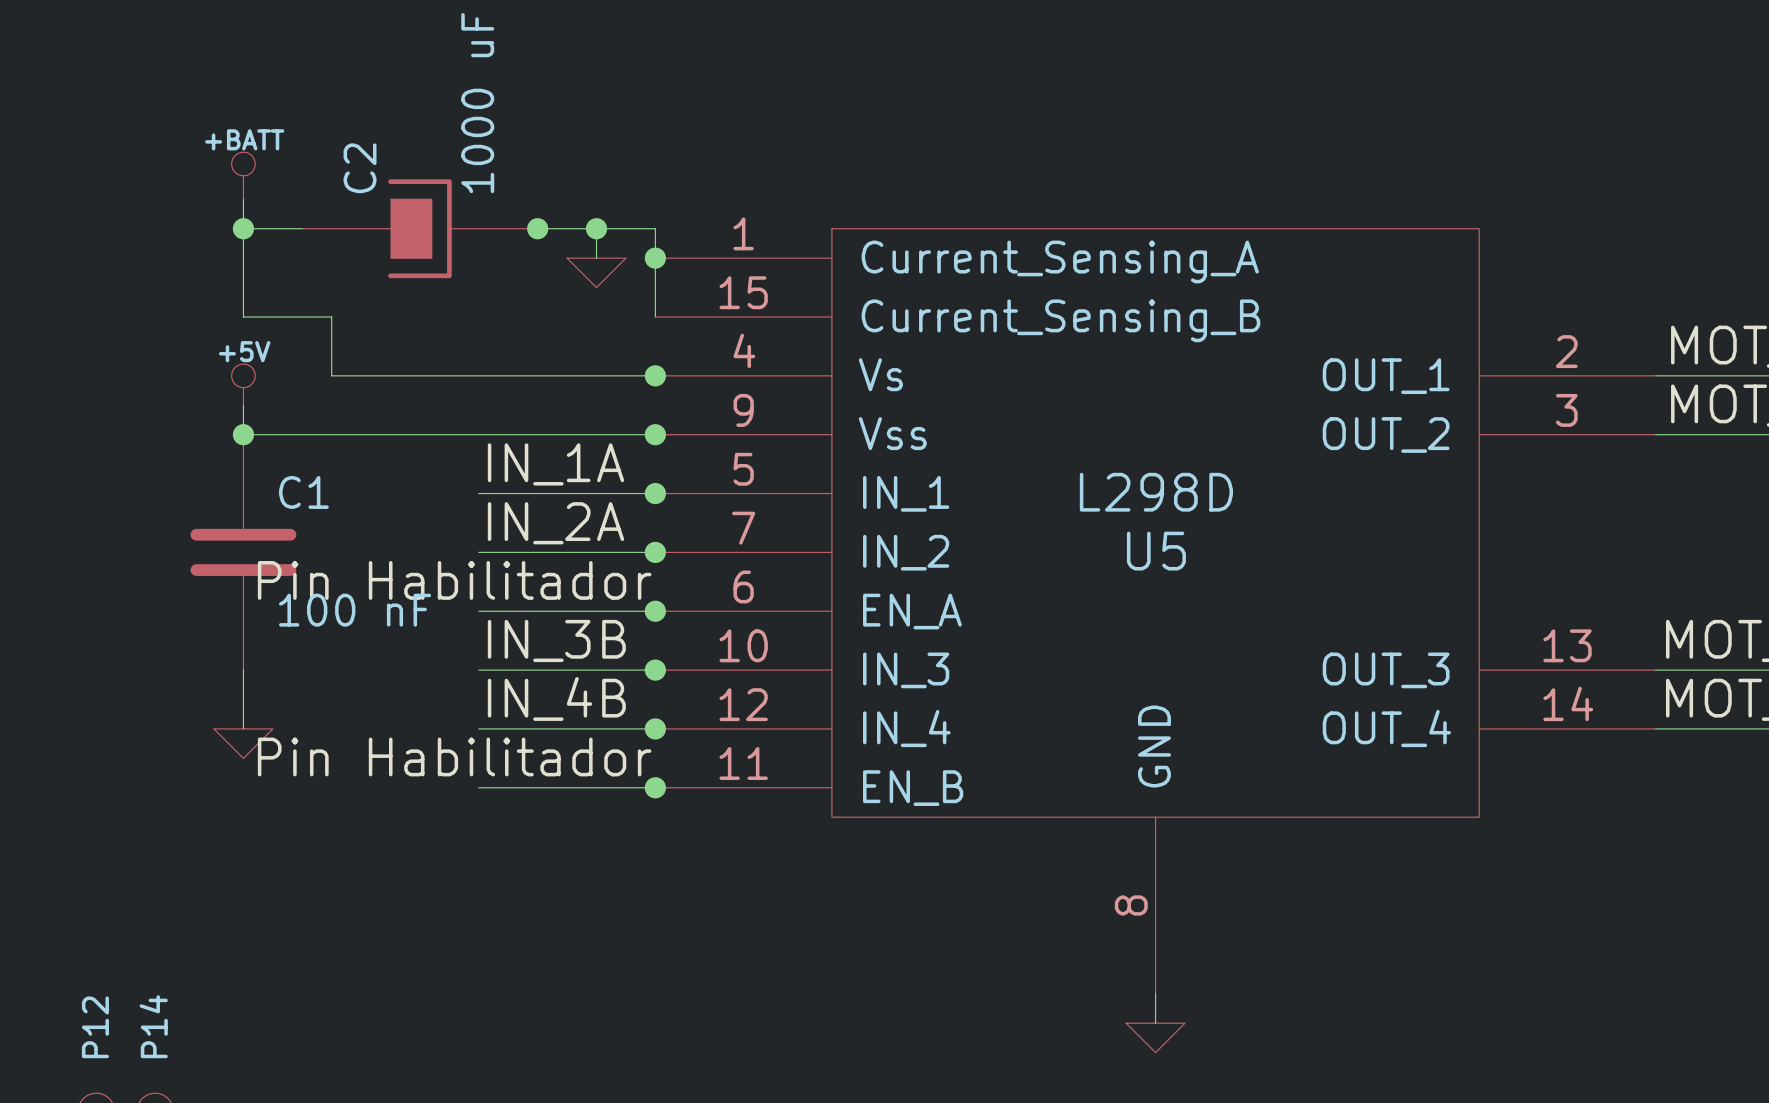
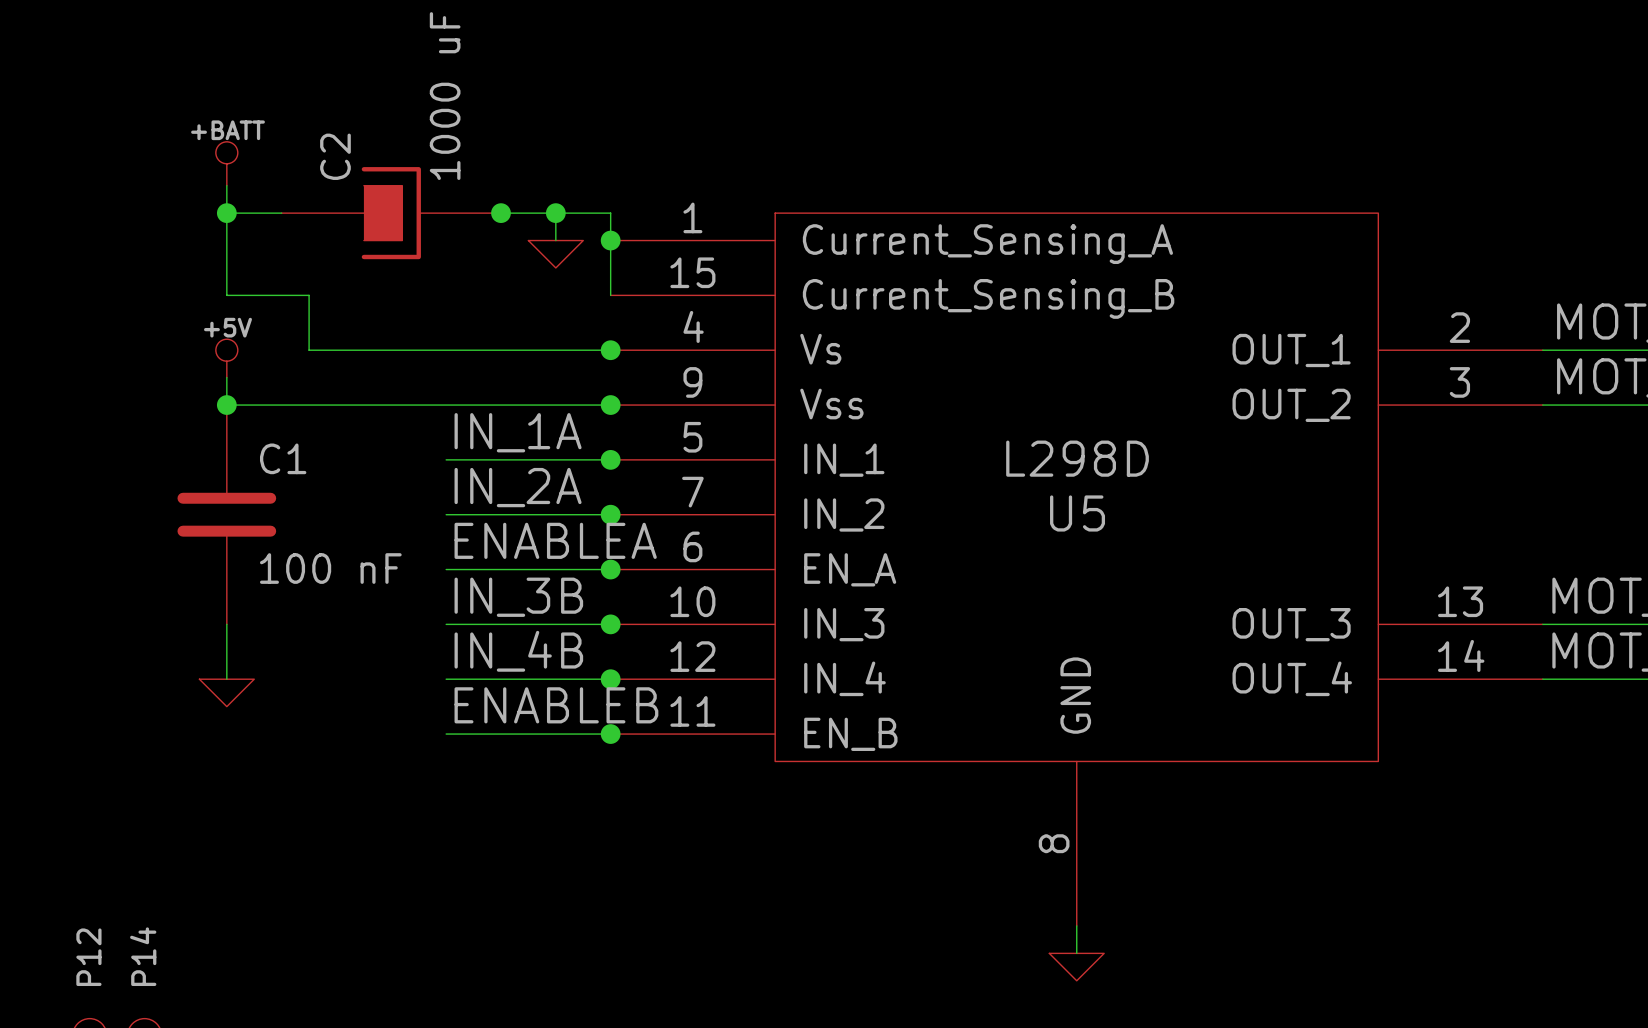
label: Pin Habilitador (454, 580) -> none
label: none -> ENABLEA (555, 540)
label: Pin Habilitador (454, 756) -> none
label: none -> ENABLEB (556, 705)

